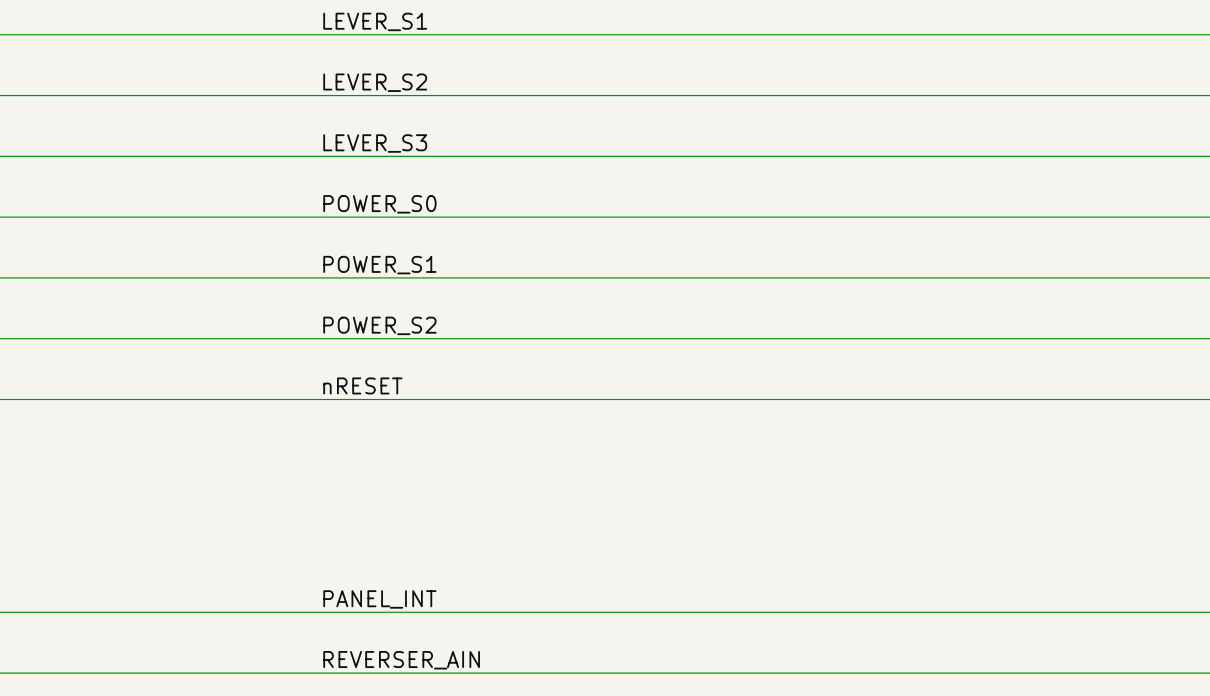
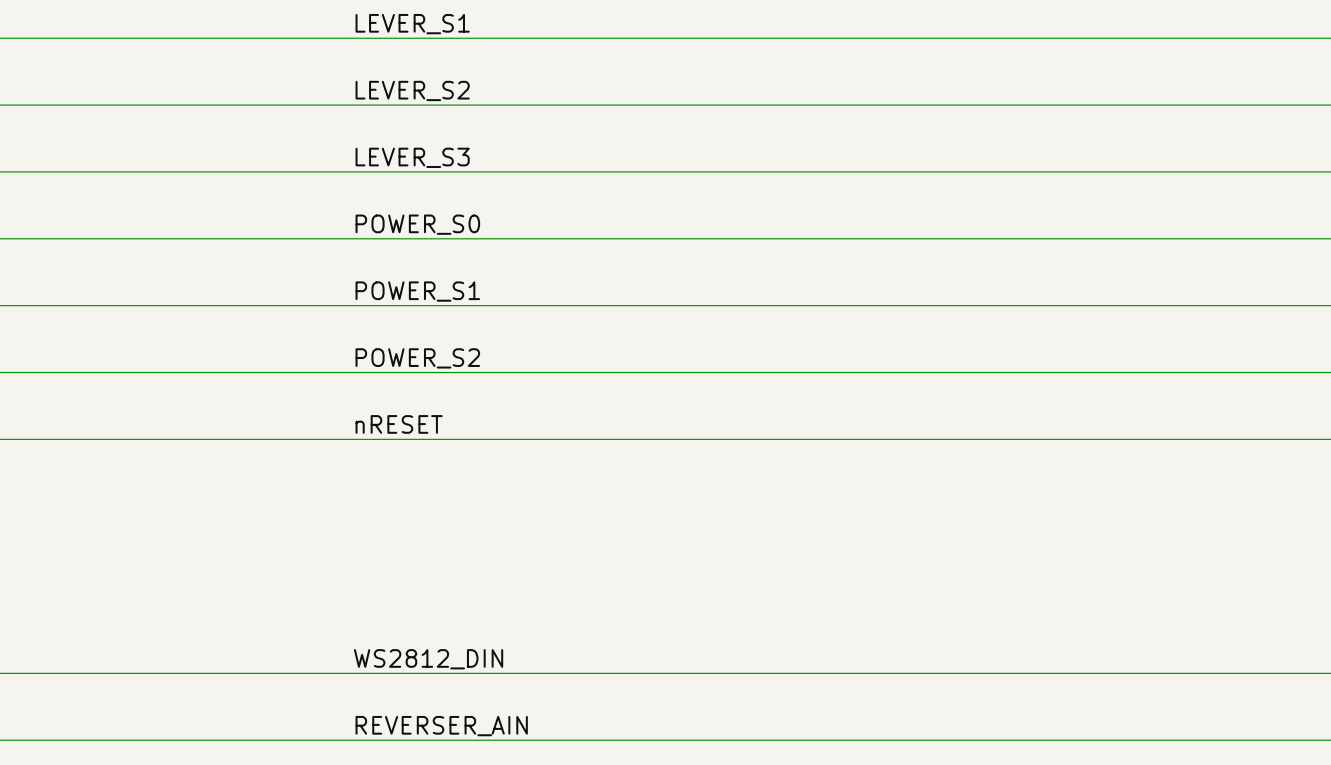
label: PANEL_INT (379, 599) -> WS2812_DIN (428, 659)

